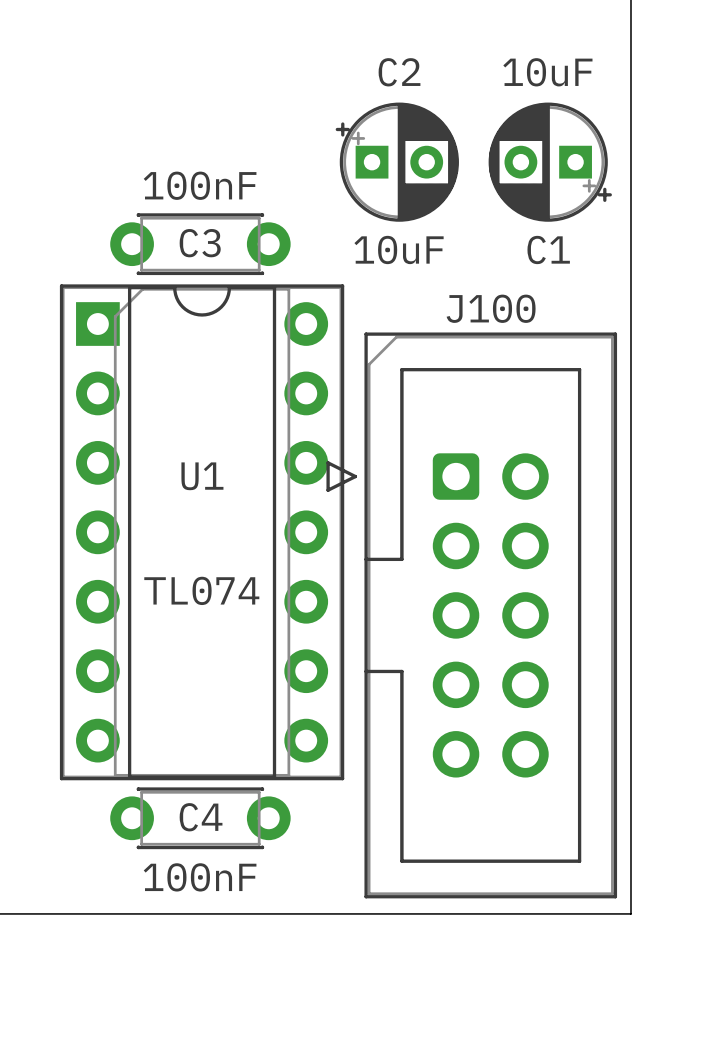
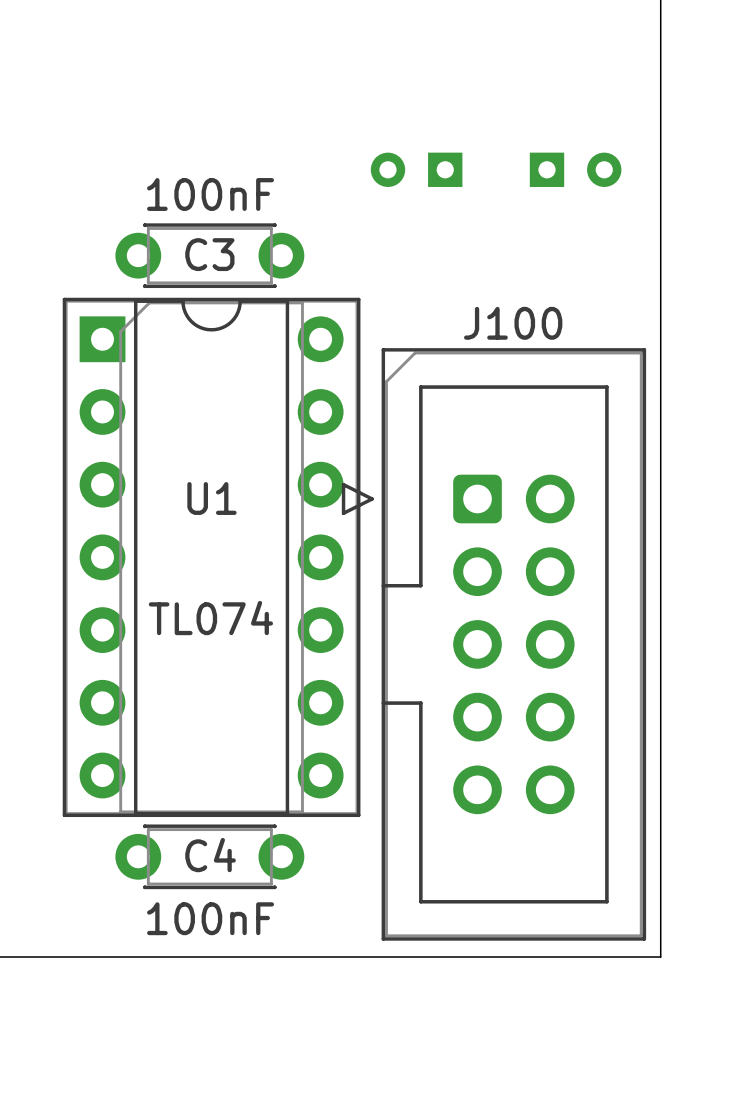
C2 side: bottom (397, 162) -> top (416, 169)
C1 side: bottom (550, 162) -> top (575, 169)

